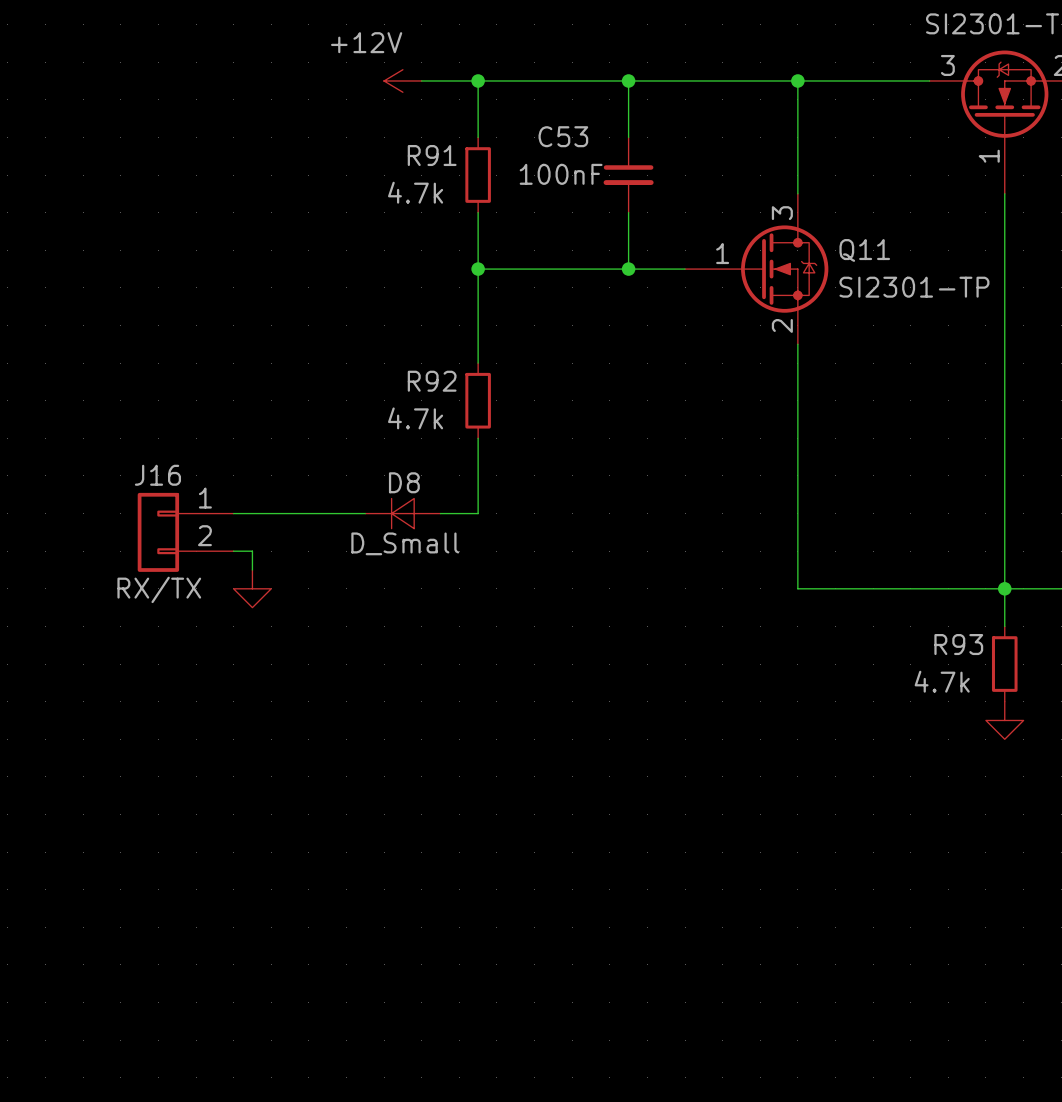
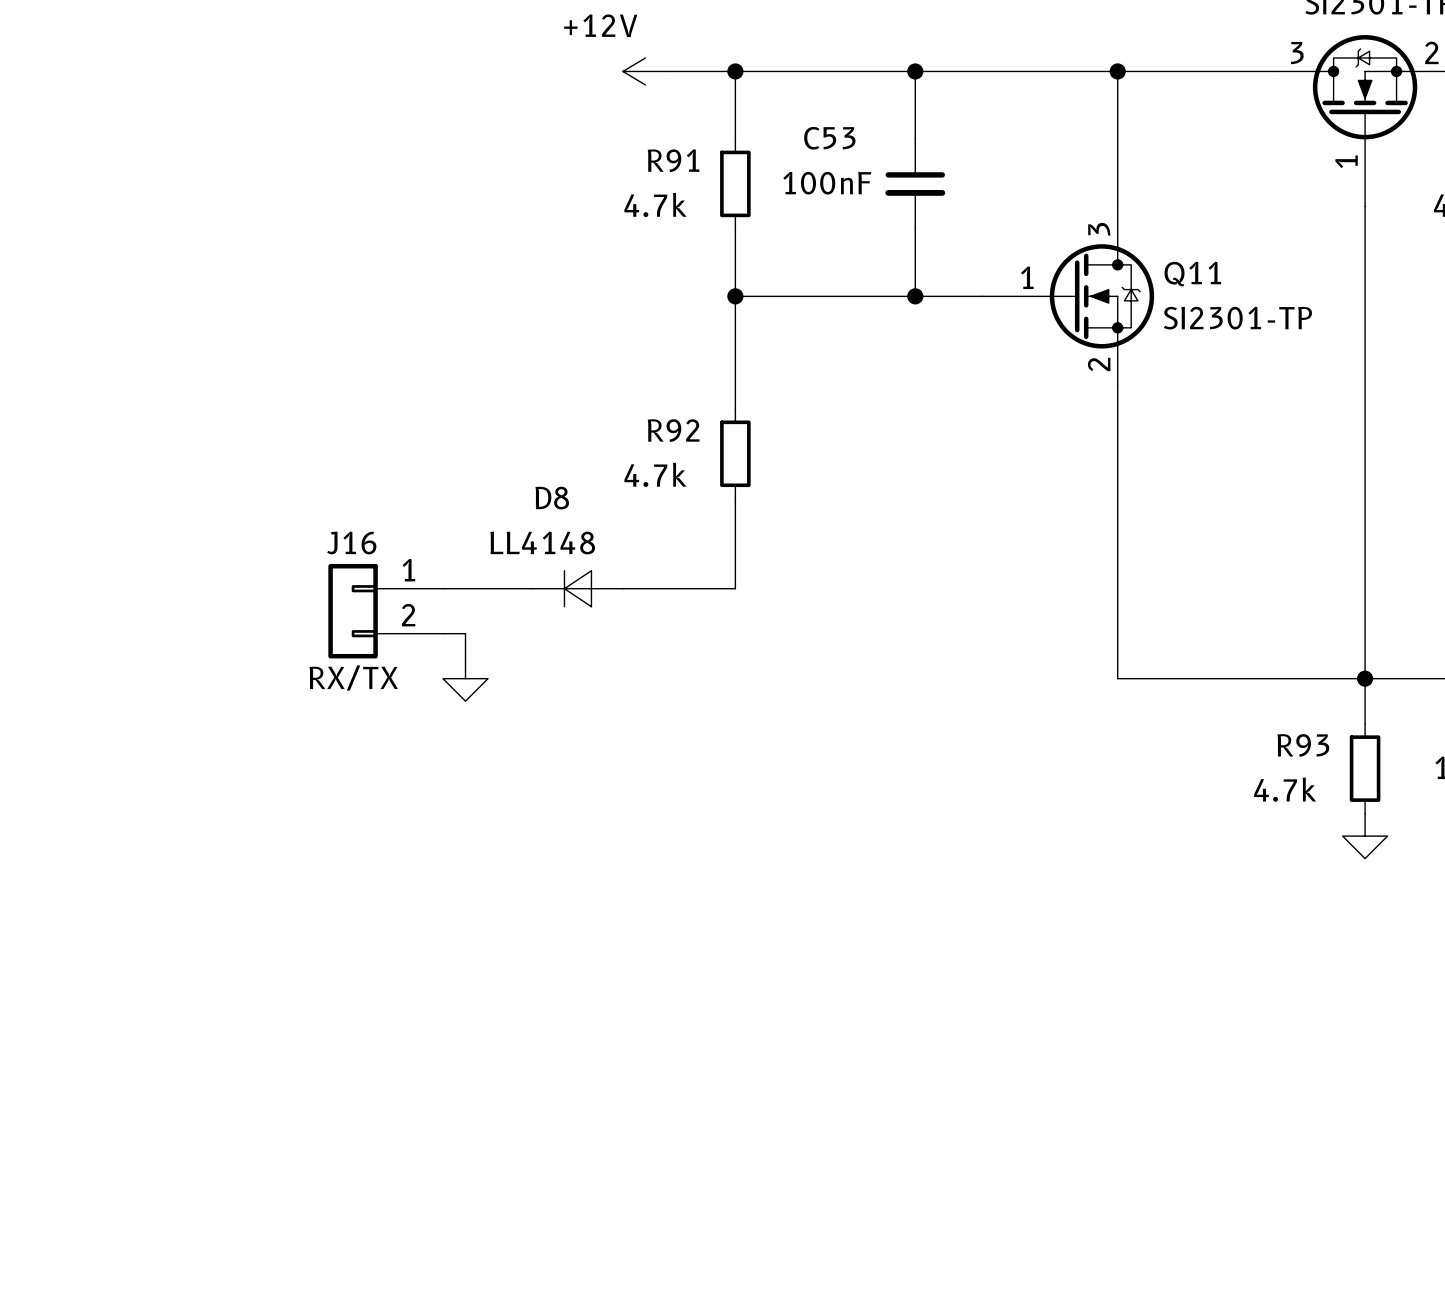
D8 name position: D8 (404, 482) -> D8 (552, 498)
D8 position: (402, 513) -> (577, 588)
D8 value: D_Small (405, 543) -> LL4148 (542, 543)

